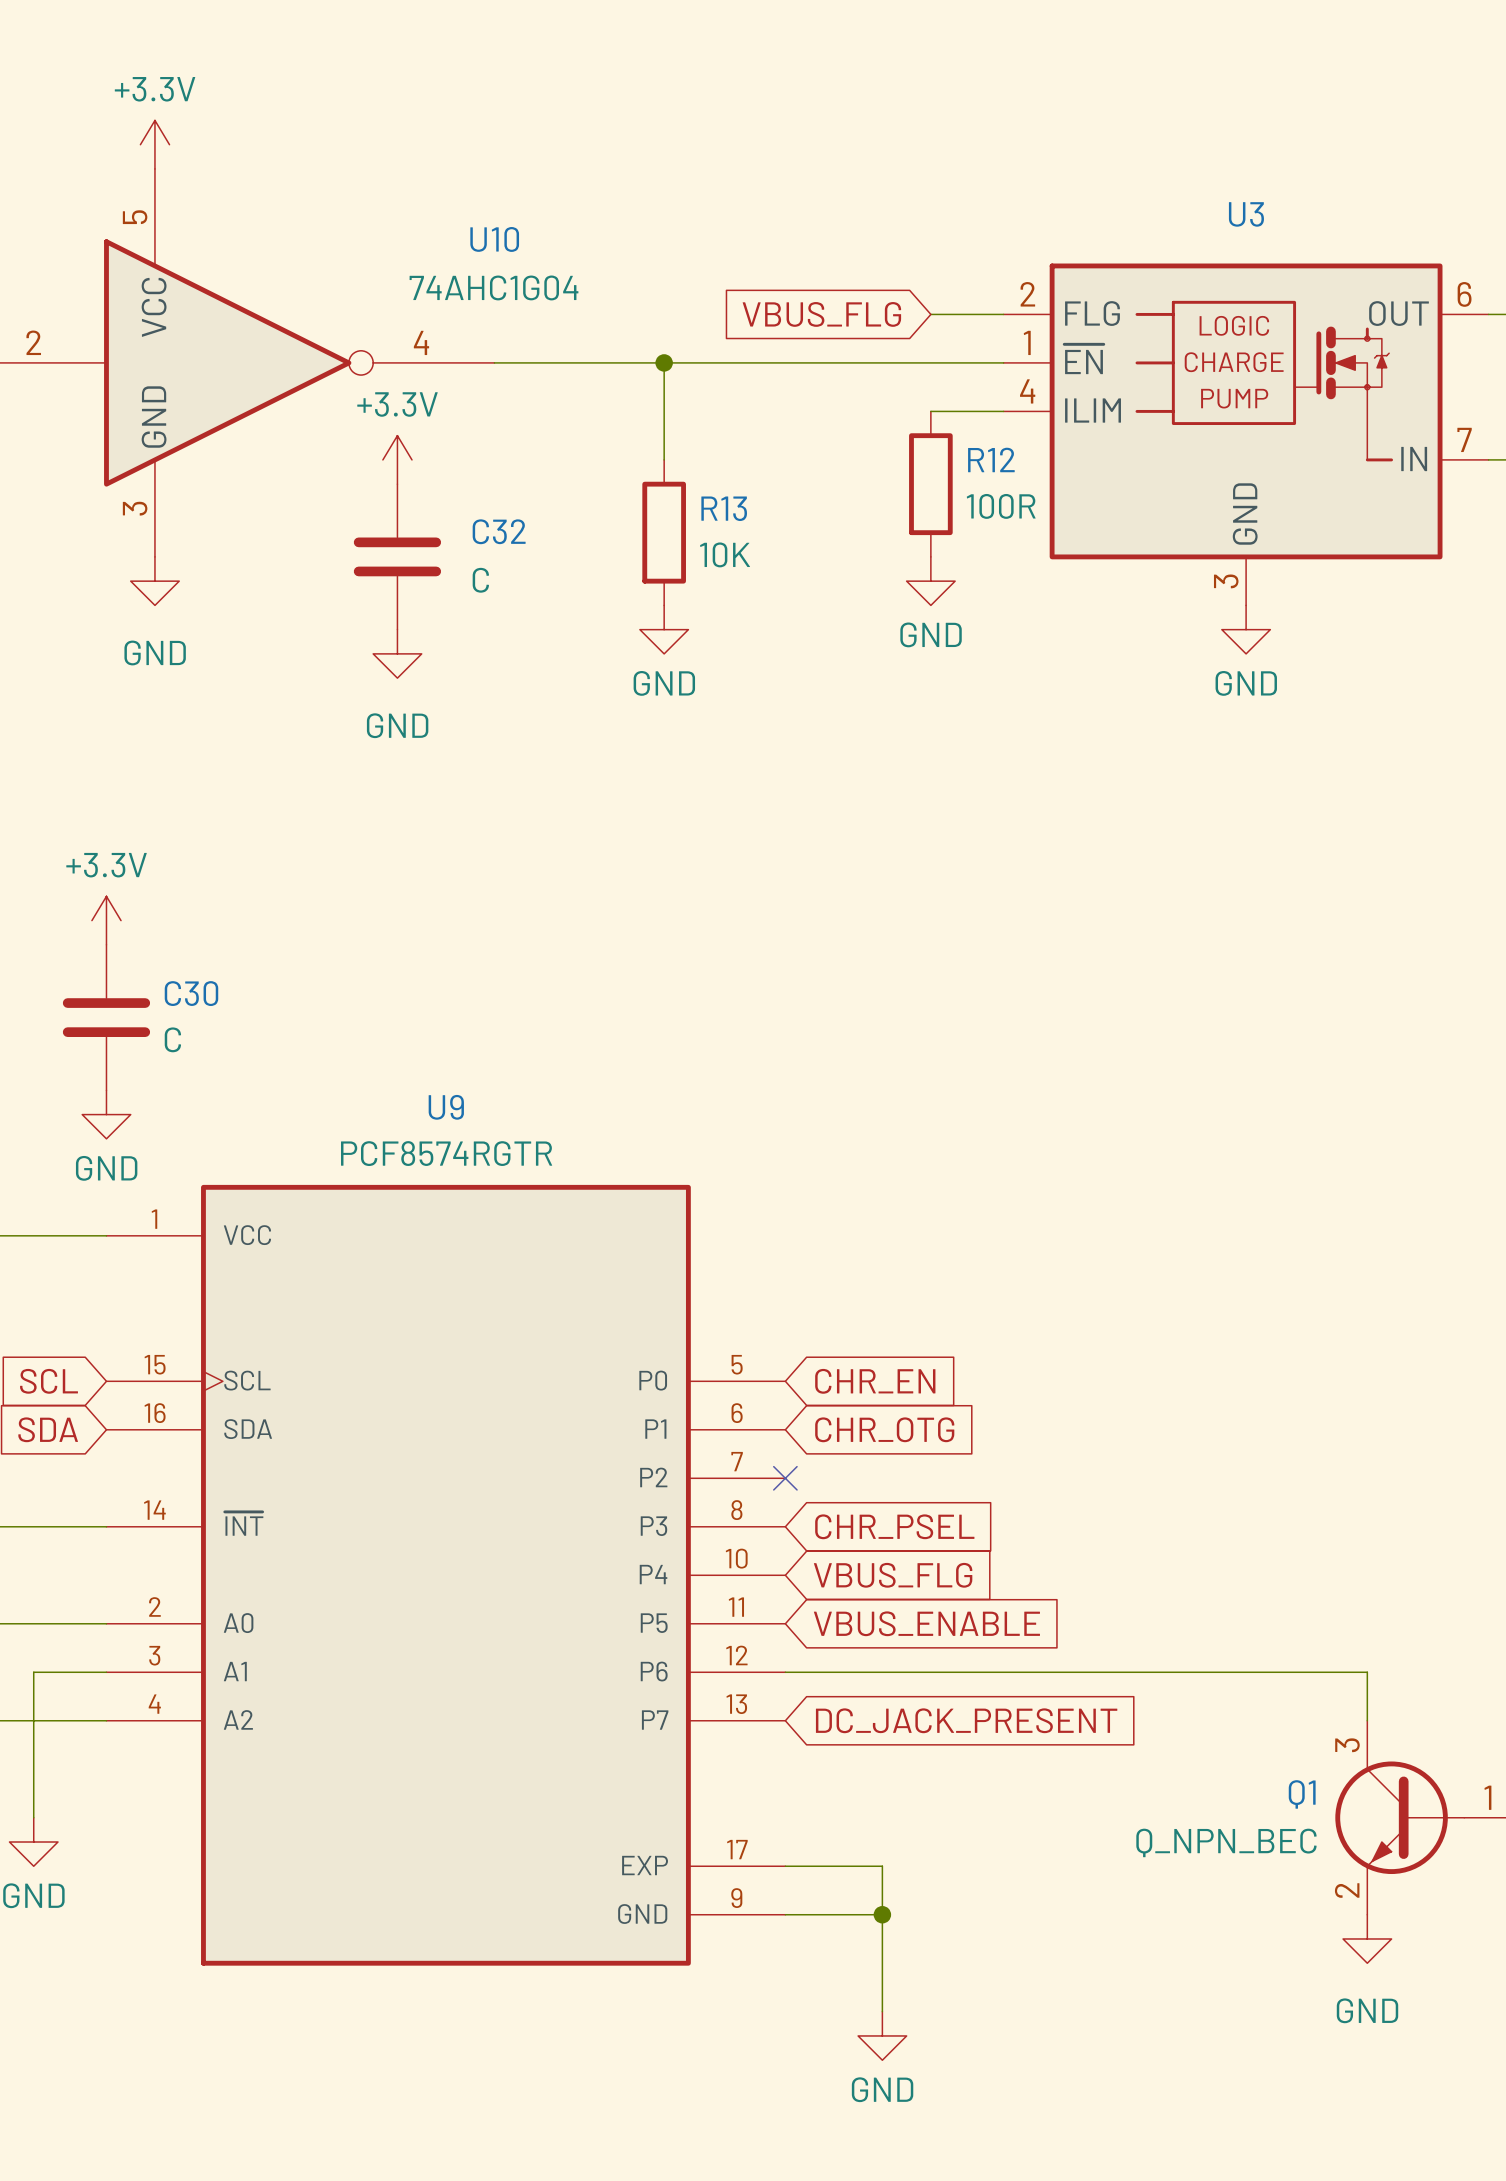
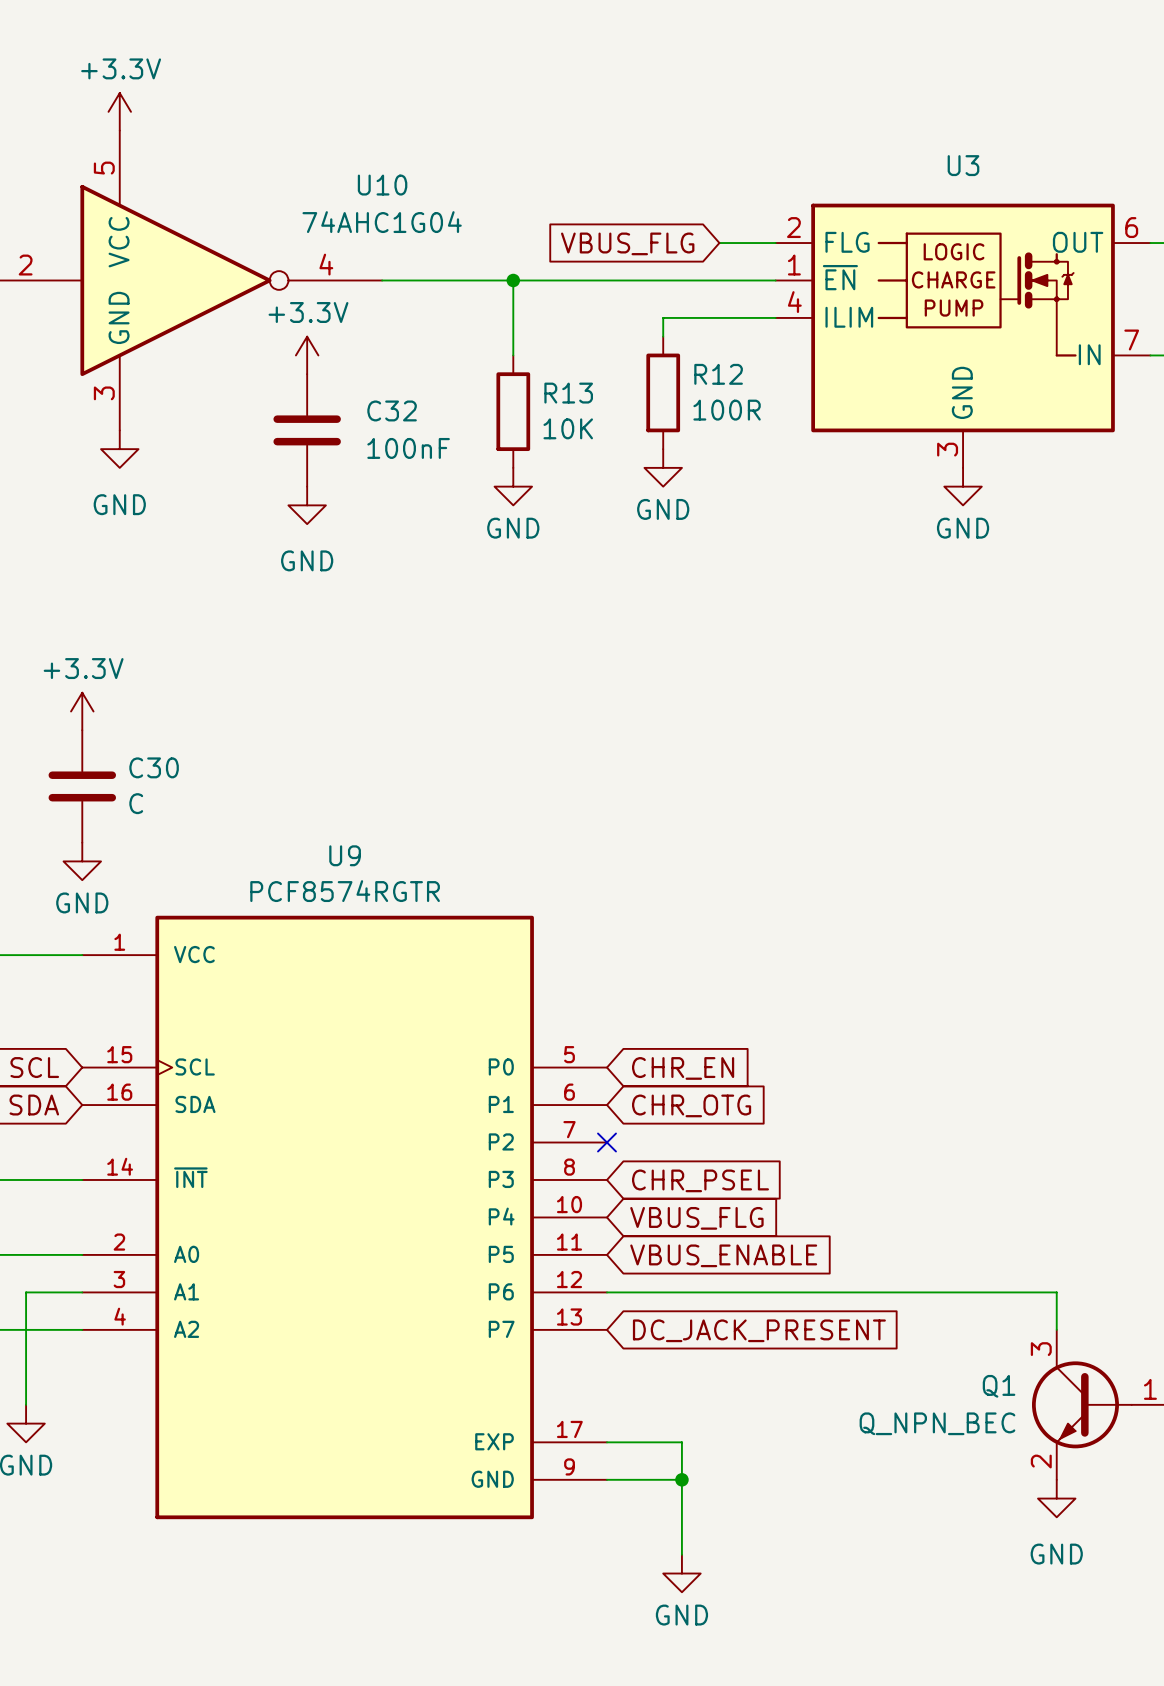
wire: none -> (719, 317) (663, 317) (663, 336)
R12 position: (930, 484) -> (663, 392)
C32 value: C (480, 580) -> 100nF (408, 448)
power symbol position: GND (930, 581) -> GND (663, 467)

